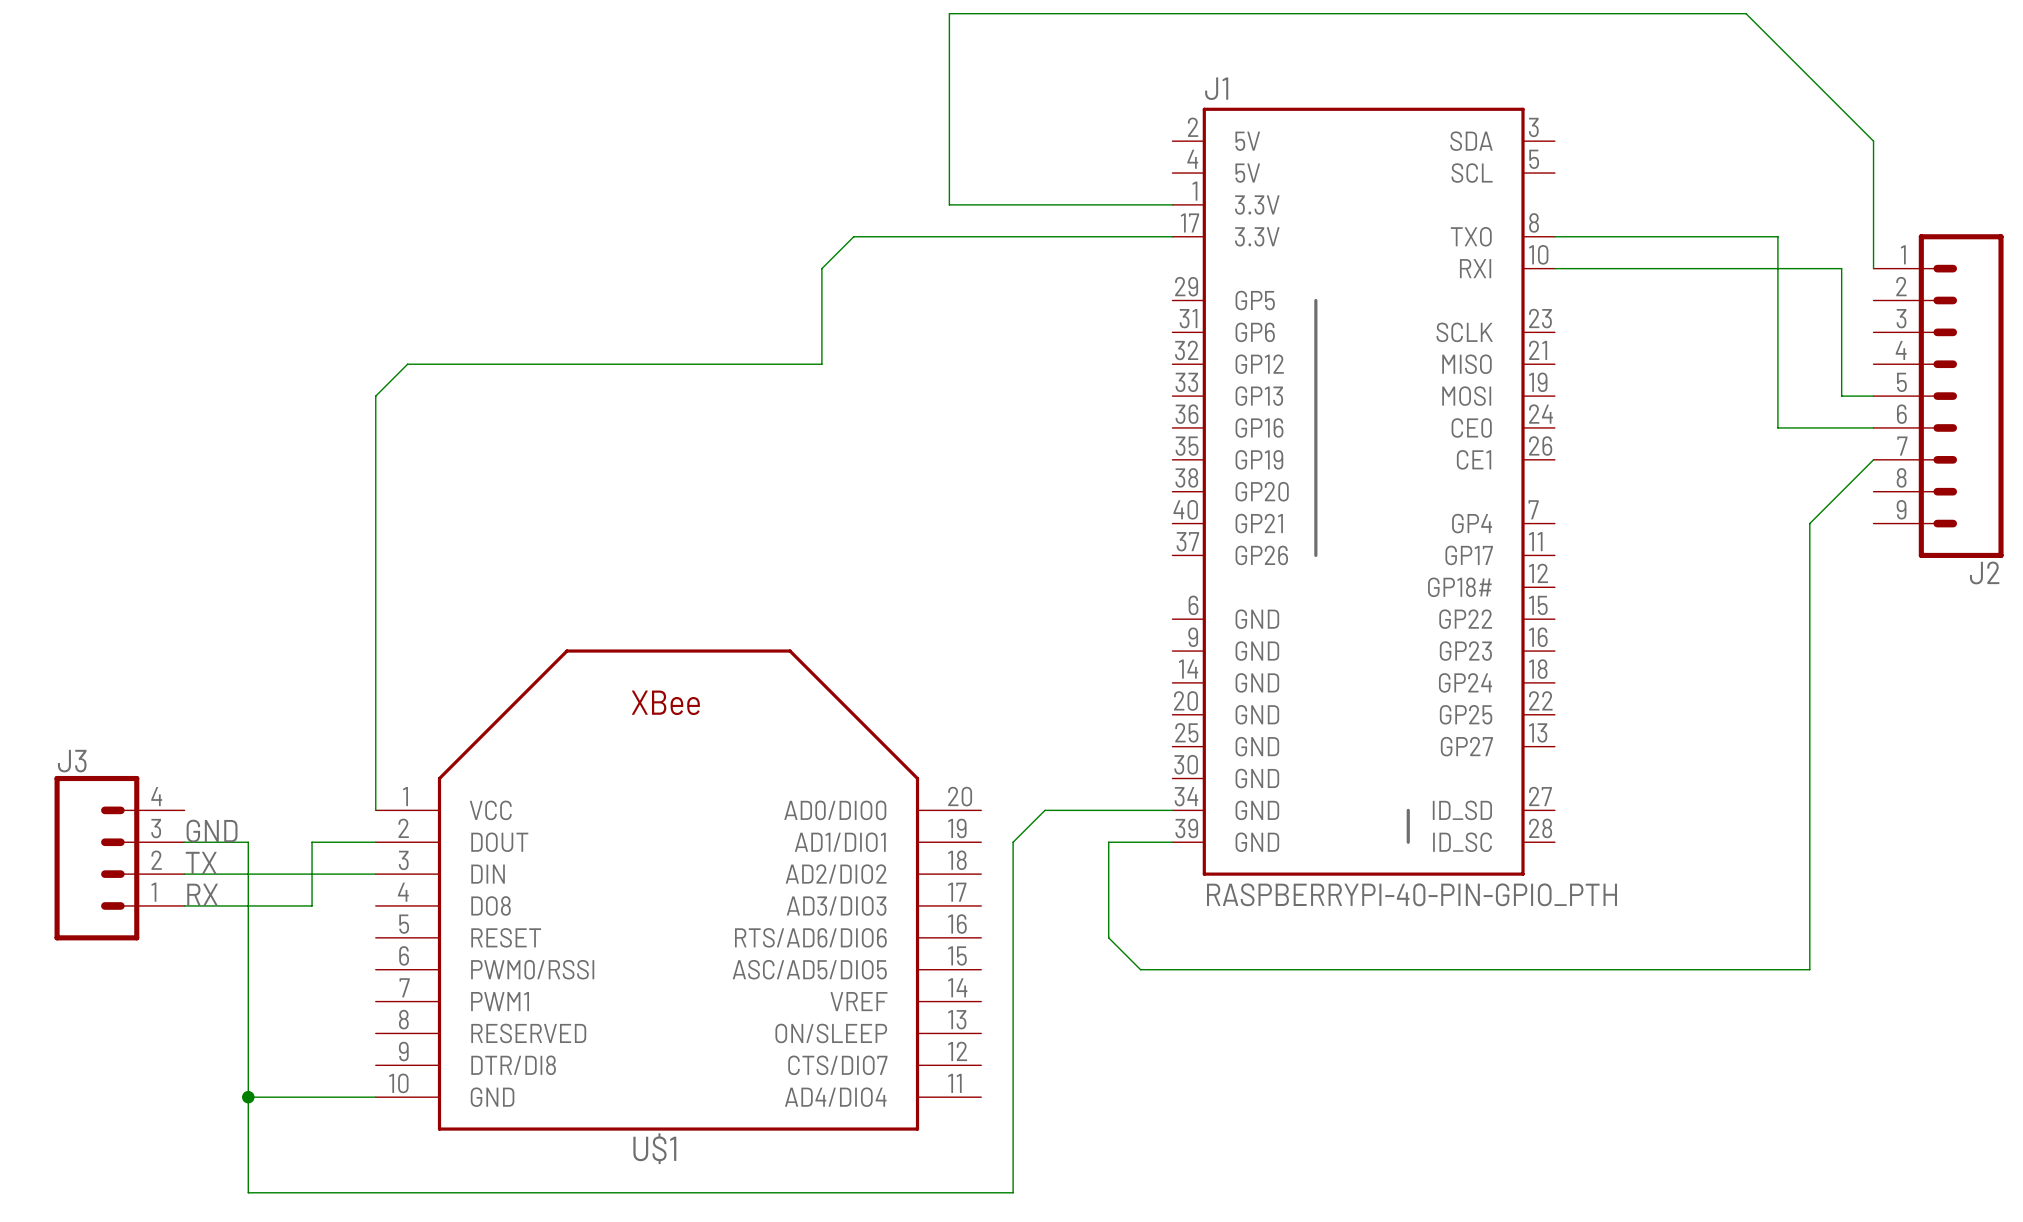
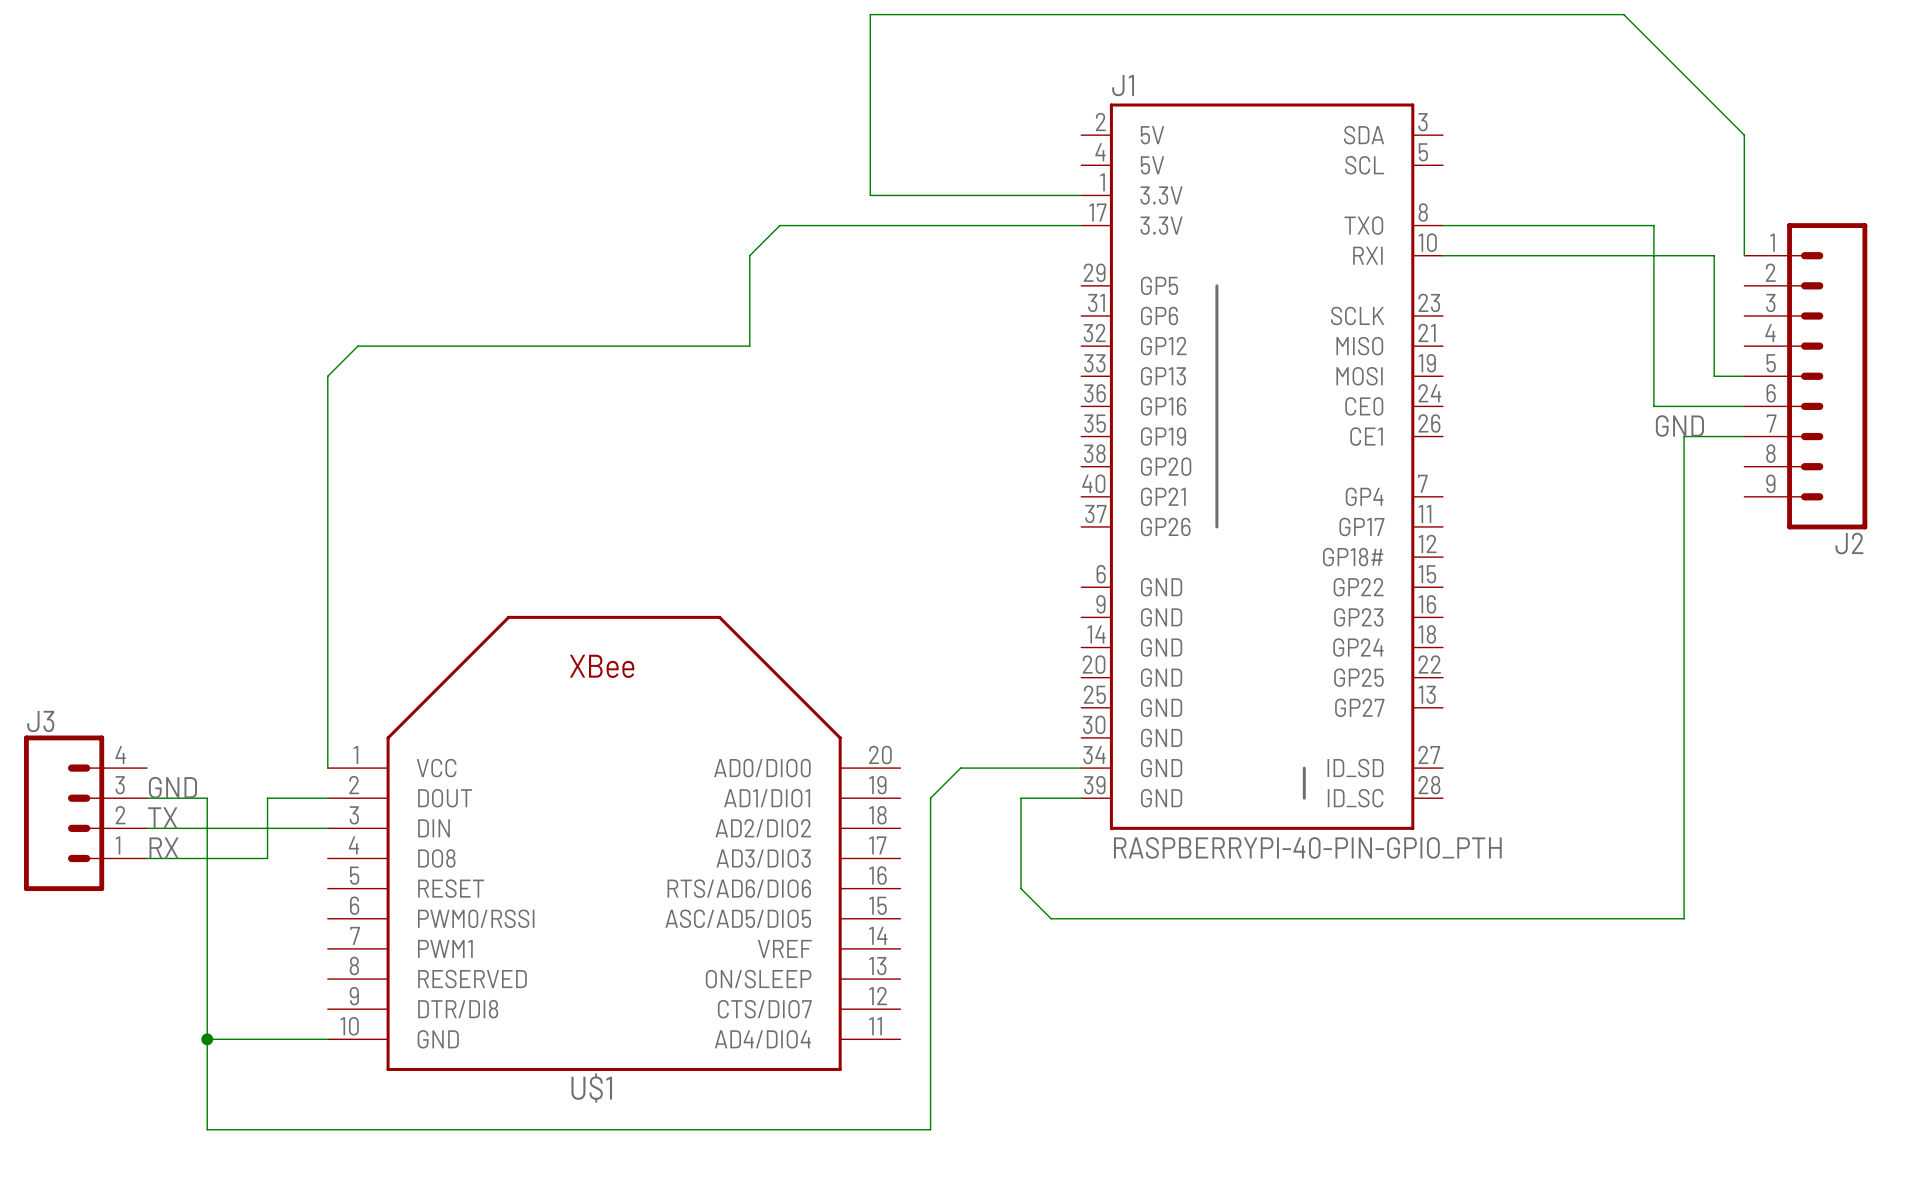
label: none -> GND (1679, 425)
wire: (1873, 459) (1809, 523) -> (1744, 436) (1684, 436) (1684, 496)

